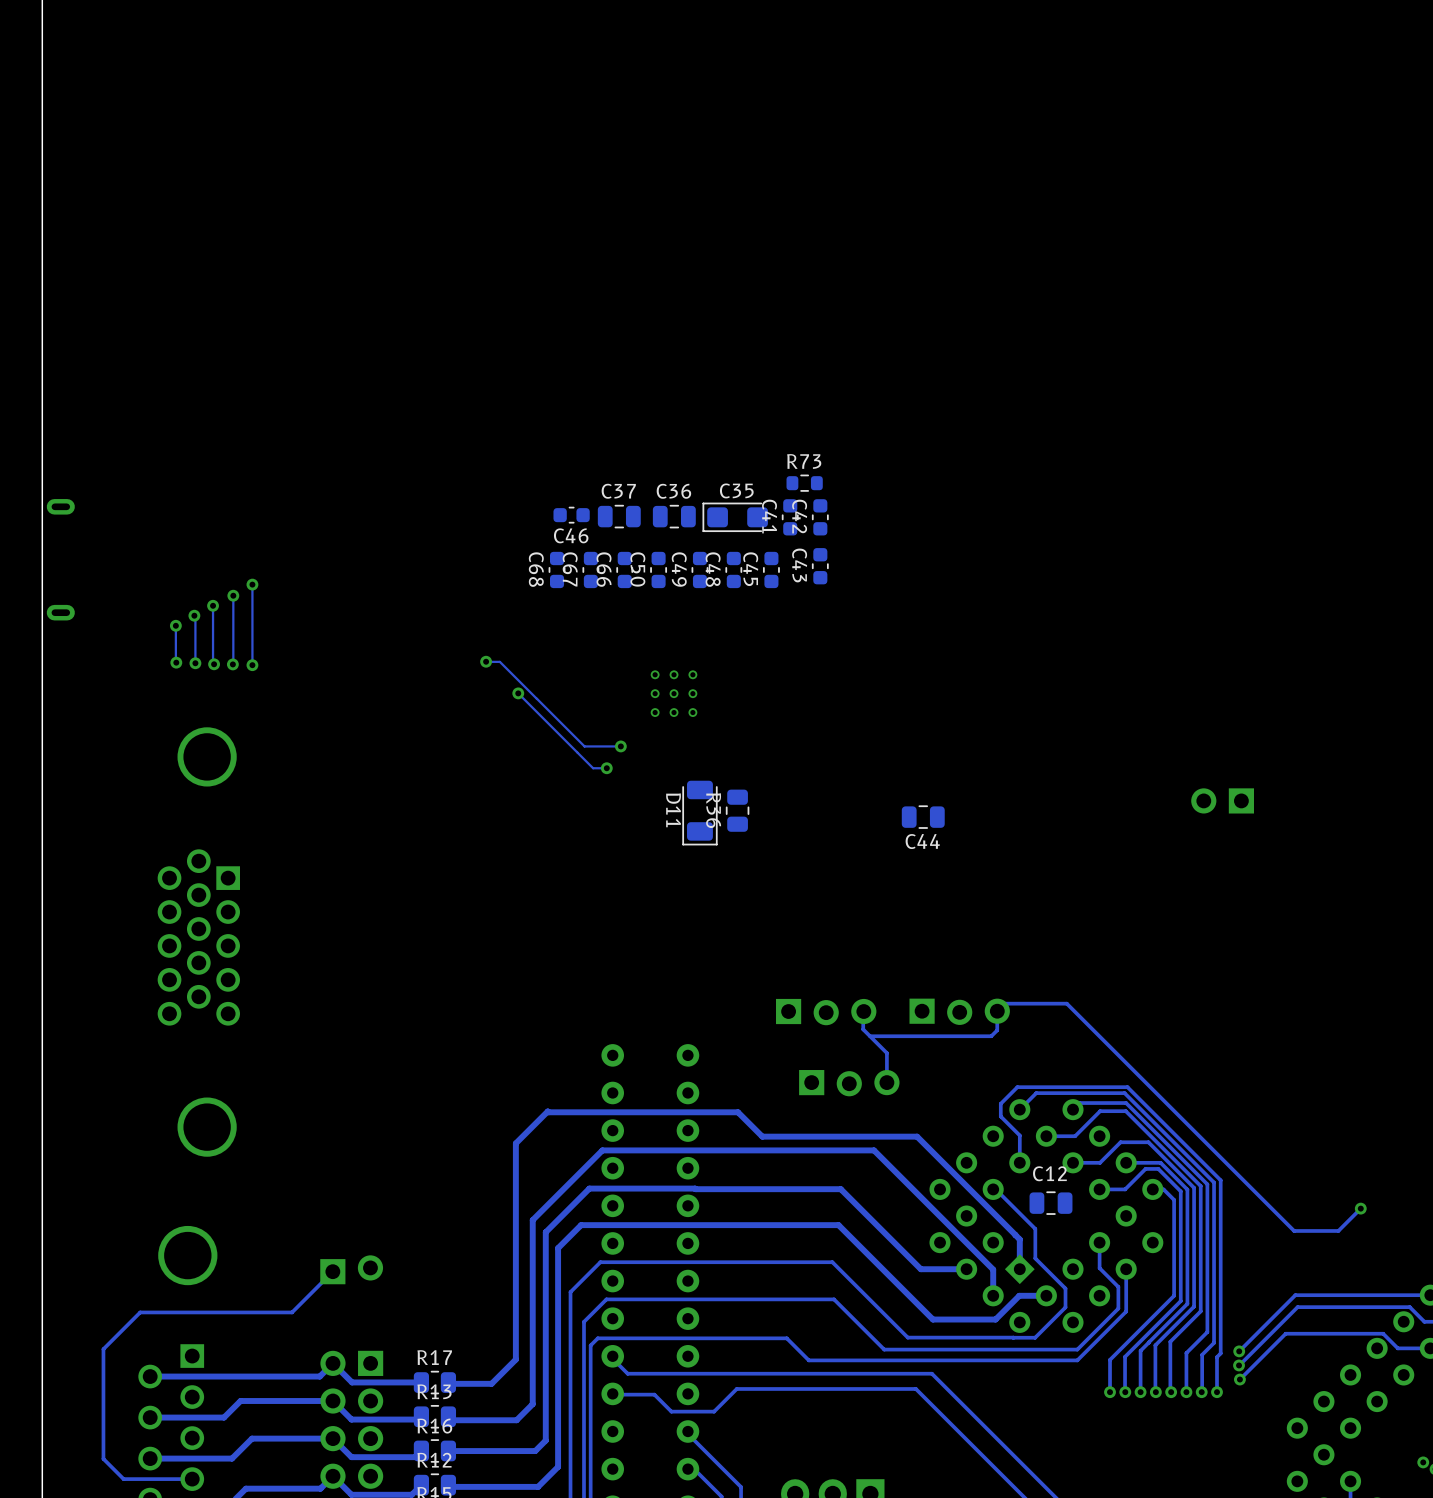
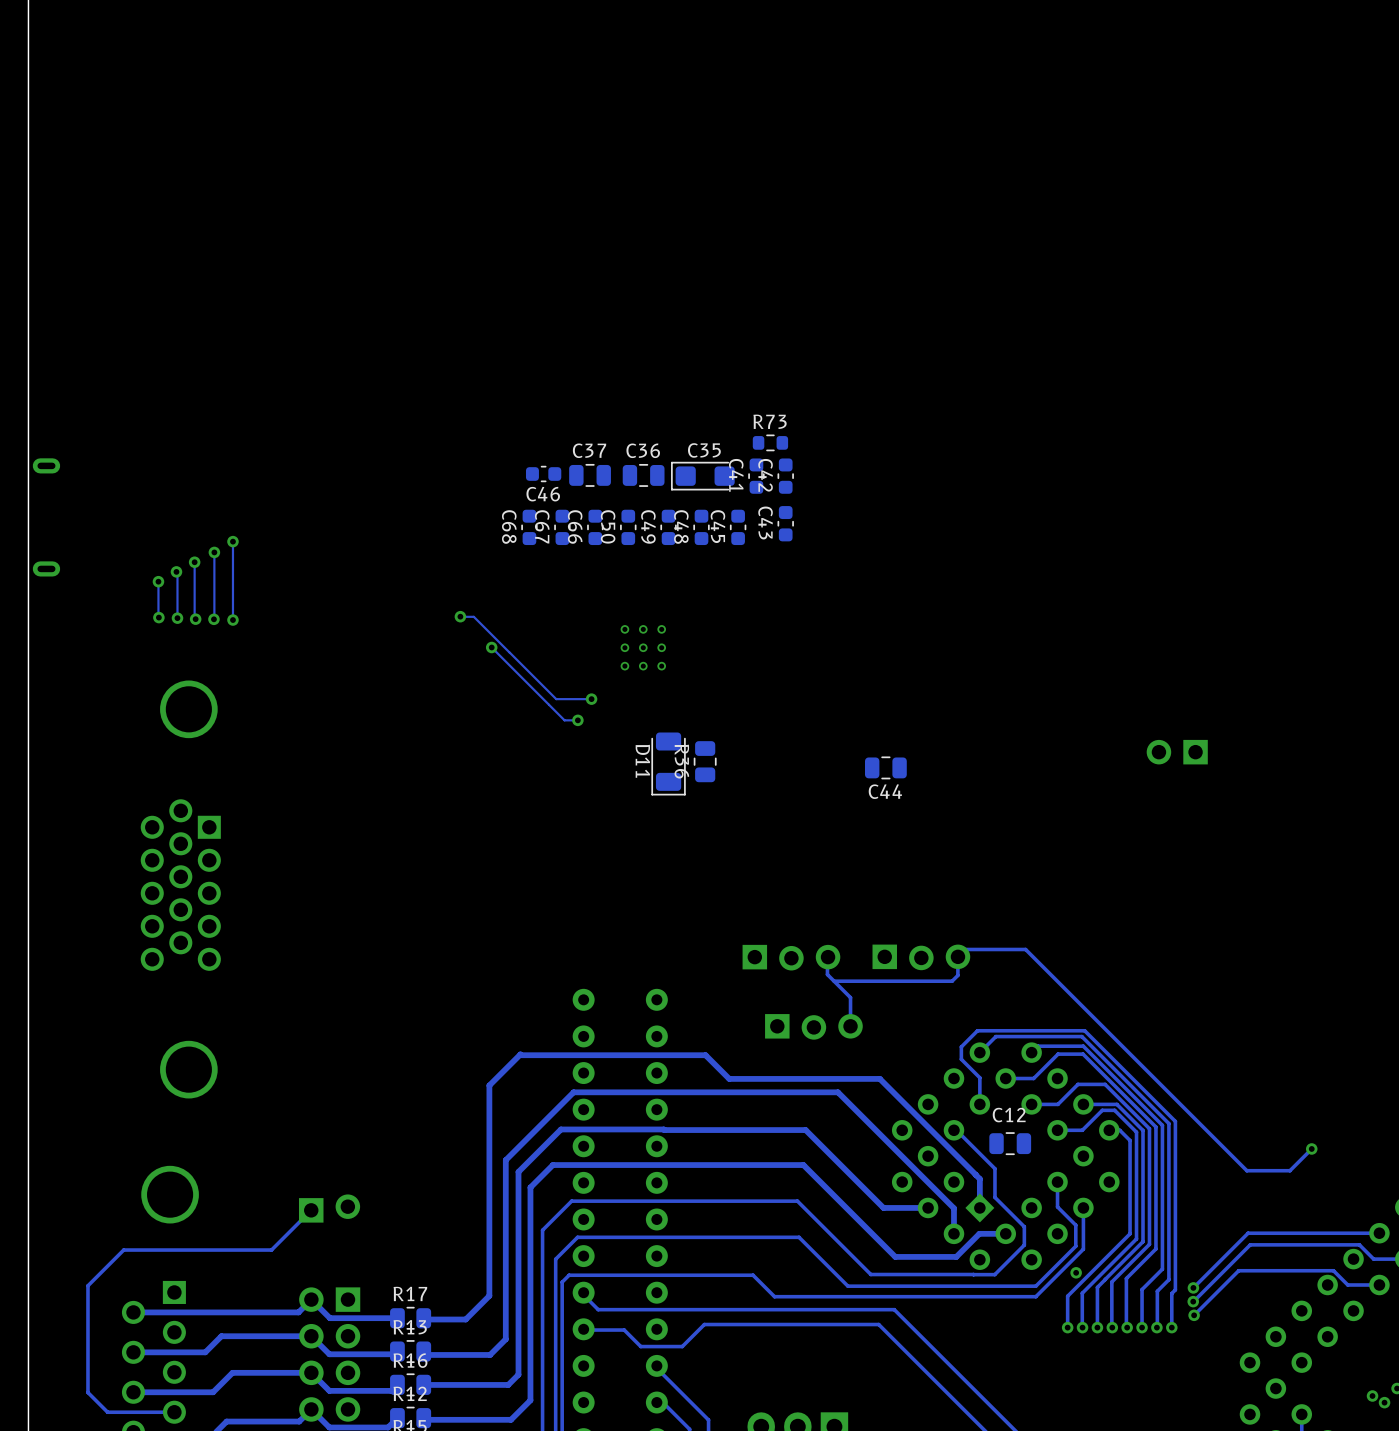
via: none -> (1076, 1272)

